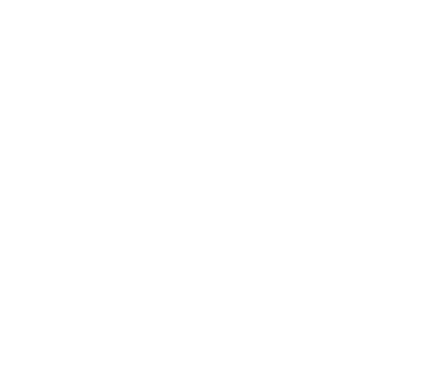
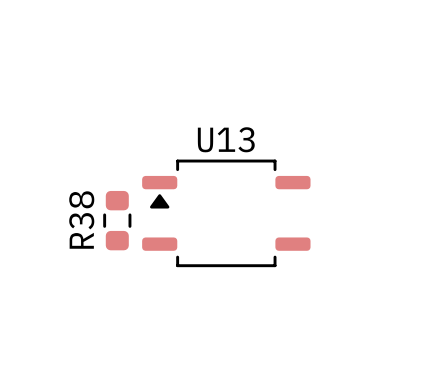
U13: none -> (226, 213)
R38: none -> (117, 220)

